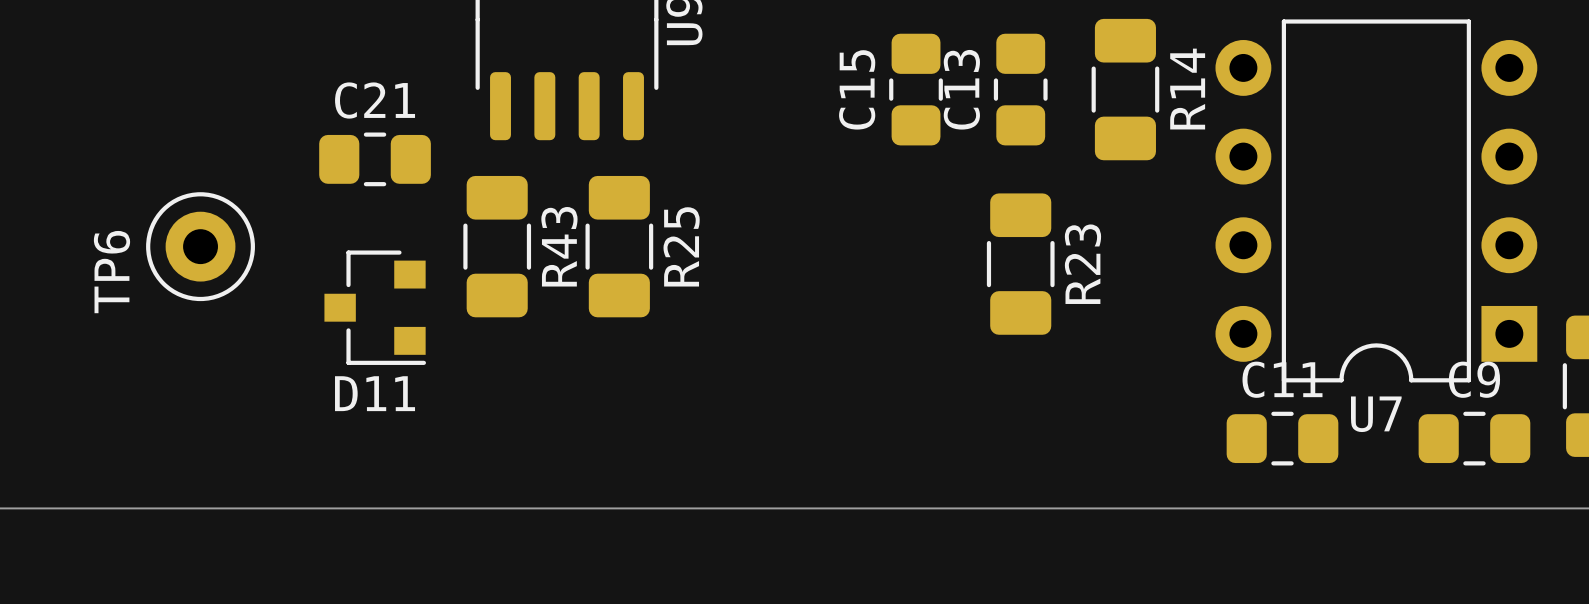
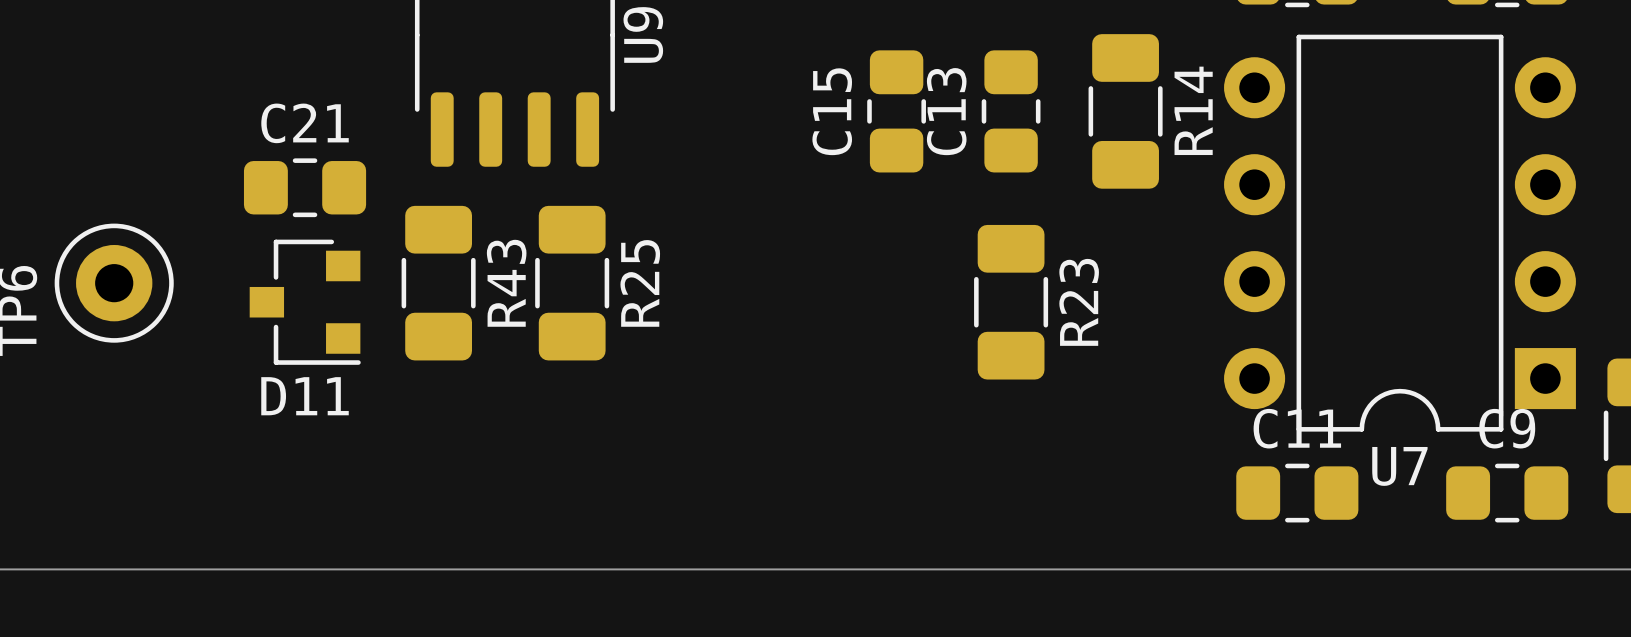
D11 position: (375, 307) -> (305, 302)

